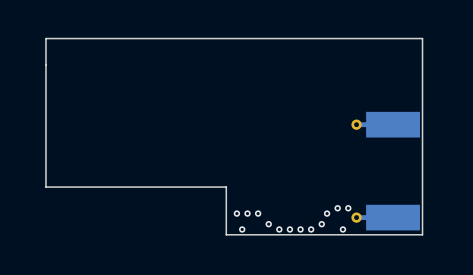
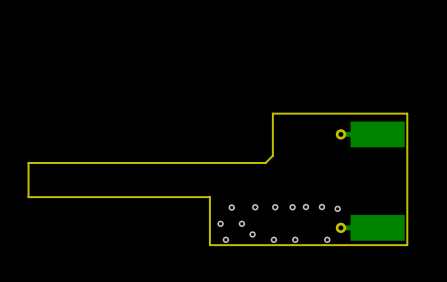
board edge: (422, 104) (422, 38) (45, 38) (45, 153) -> (407, 113) (272, 113) (272, 155) (265, 162) (28, 162)
via: none -> (305, 207)
via: none -> (321, 207)
via: none -> (231, 207)
via: none -> (255, 207)
via: none -> (275, 207)
via: none -> (292, 207)
via: none -> (337, 208)
via: (337, 208) -> none
via: (348, 208) -> none
via: (247, 213) -> none
via: (327, 213) -> none
via: (321, 224) -> none
via: (279, 229) -> none
via: (300, 229) -> none

